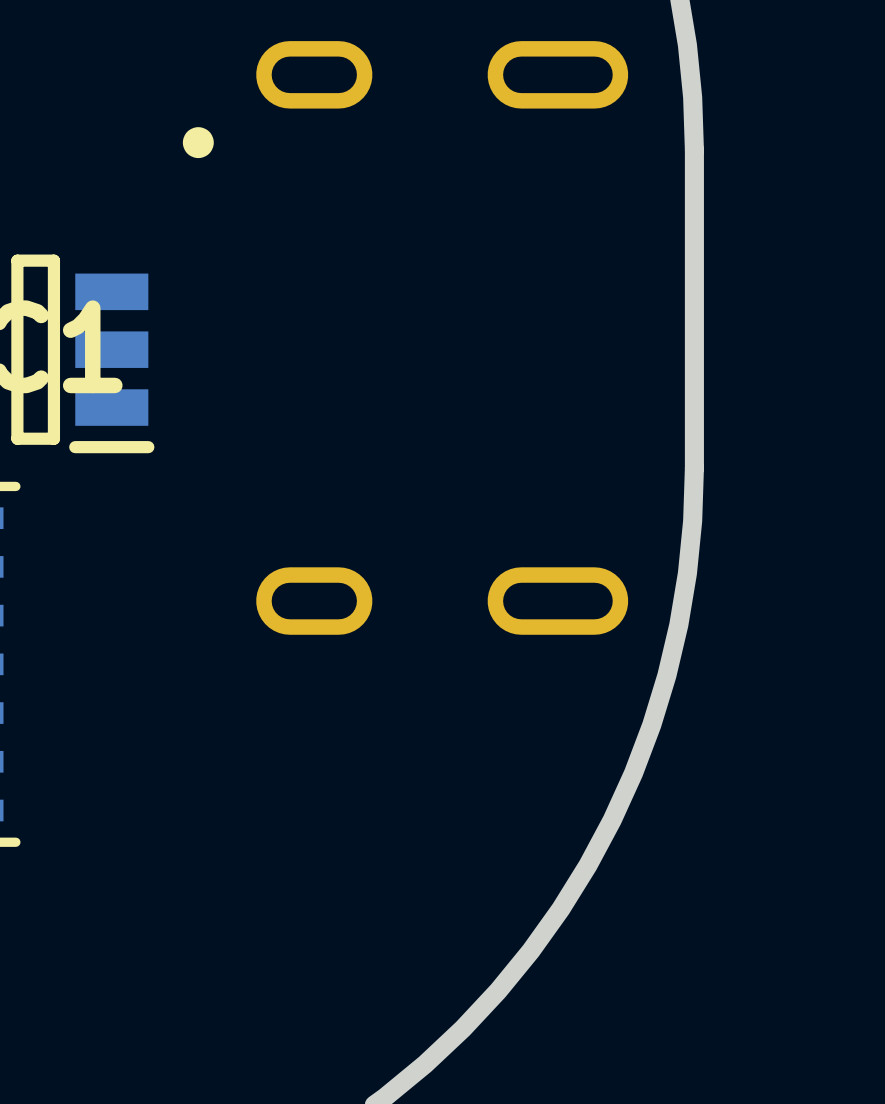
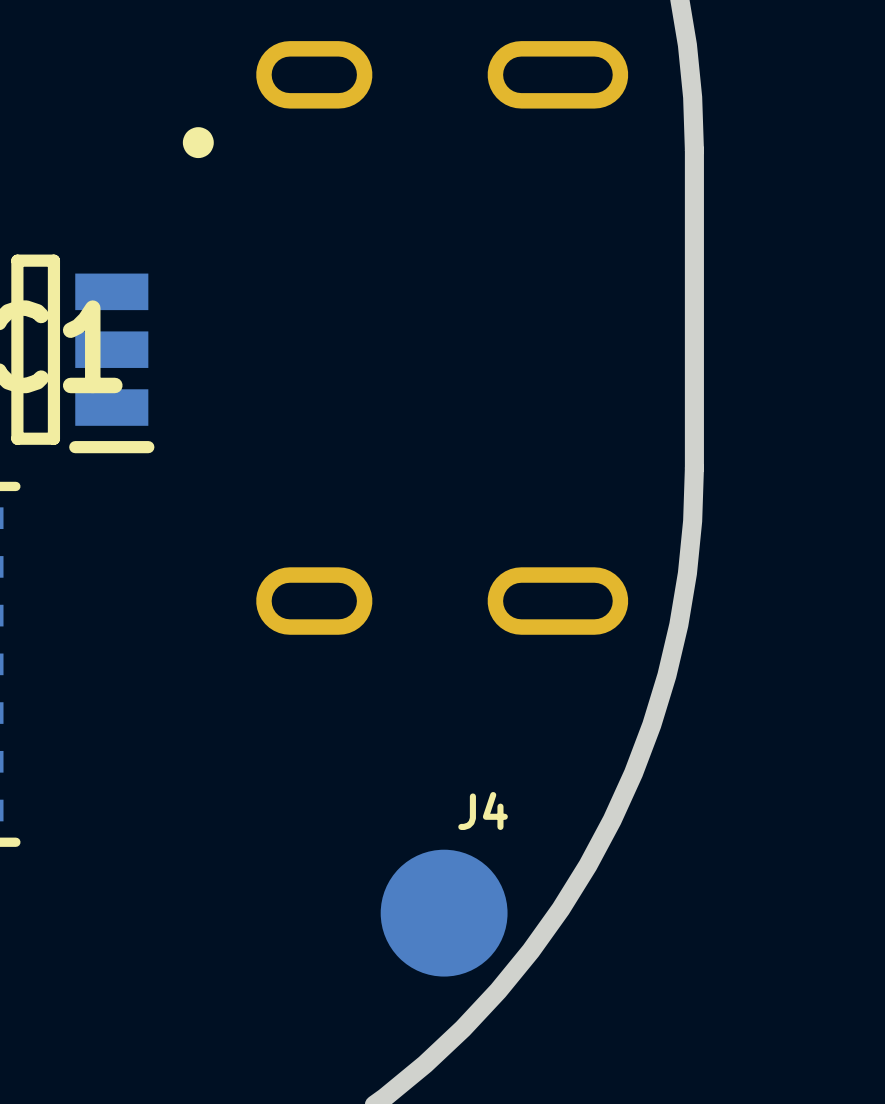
J4: none -> (444, 913)

